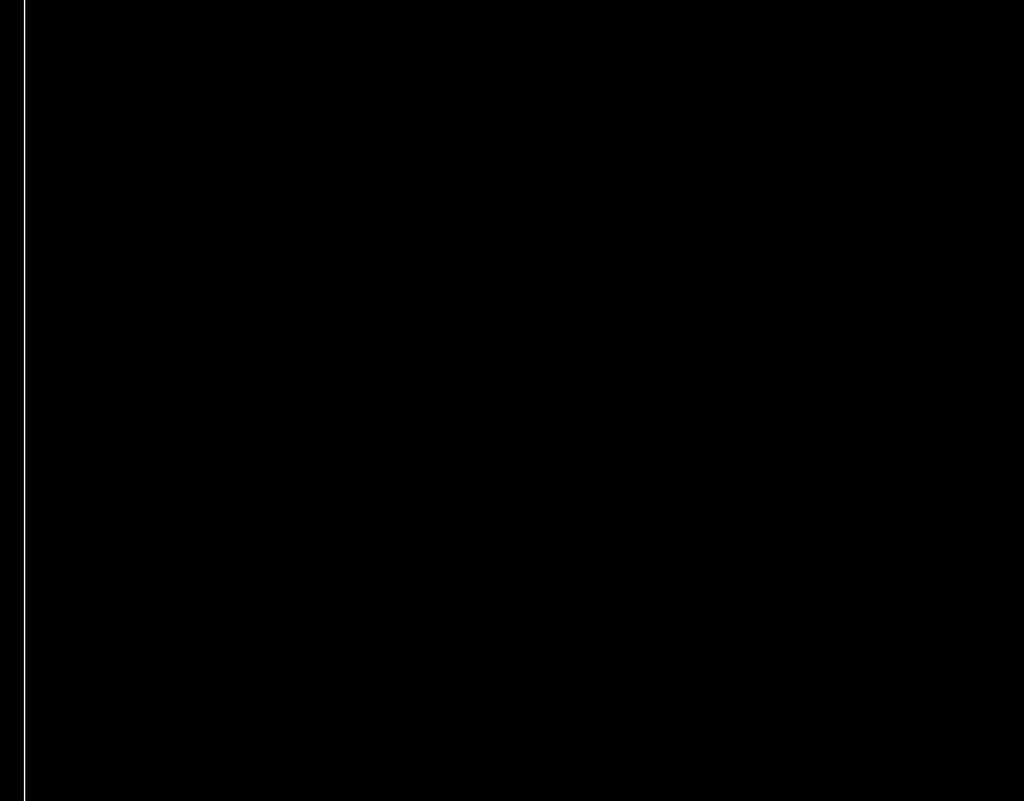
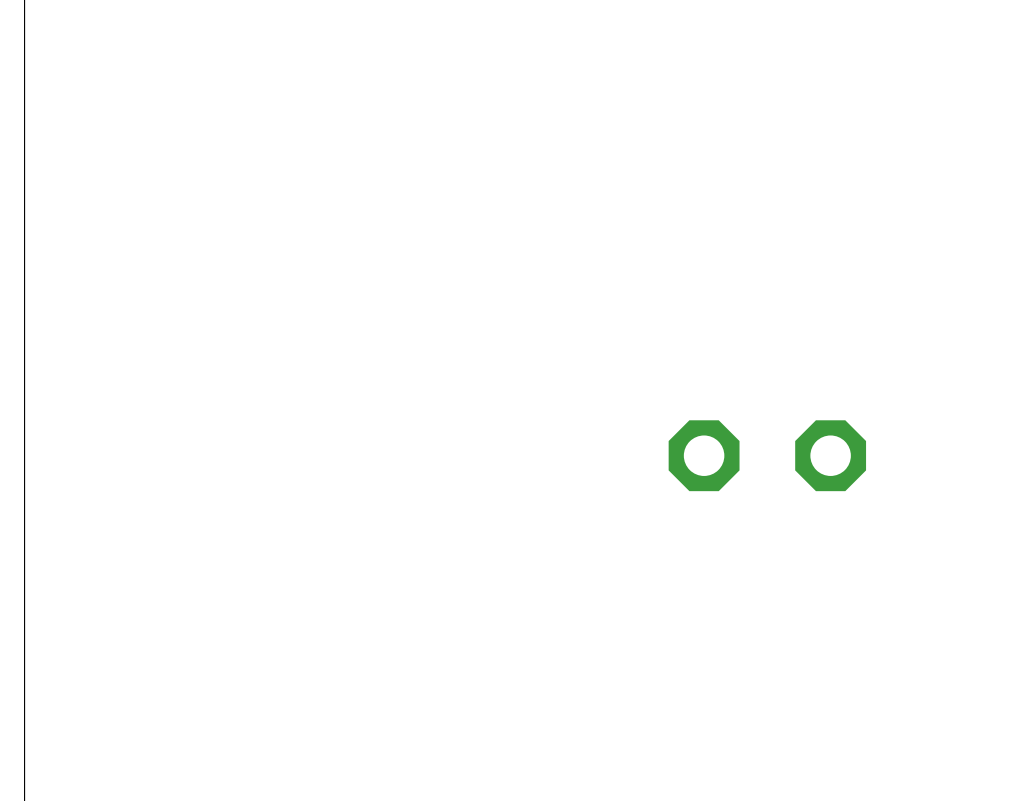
part: none -> (767, 455)

